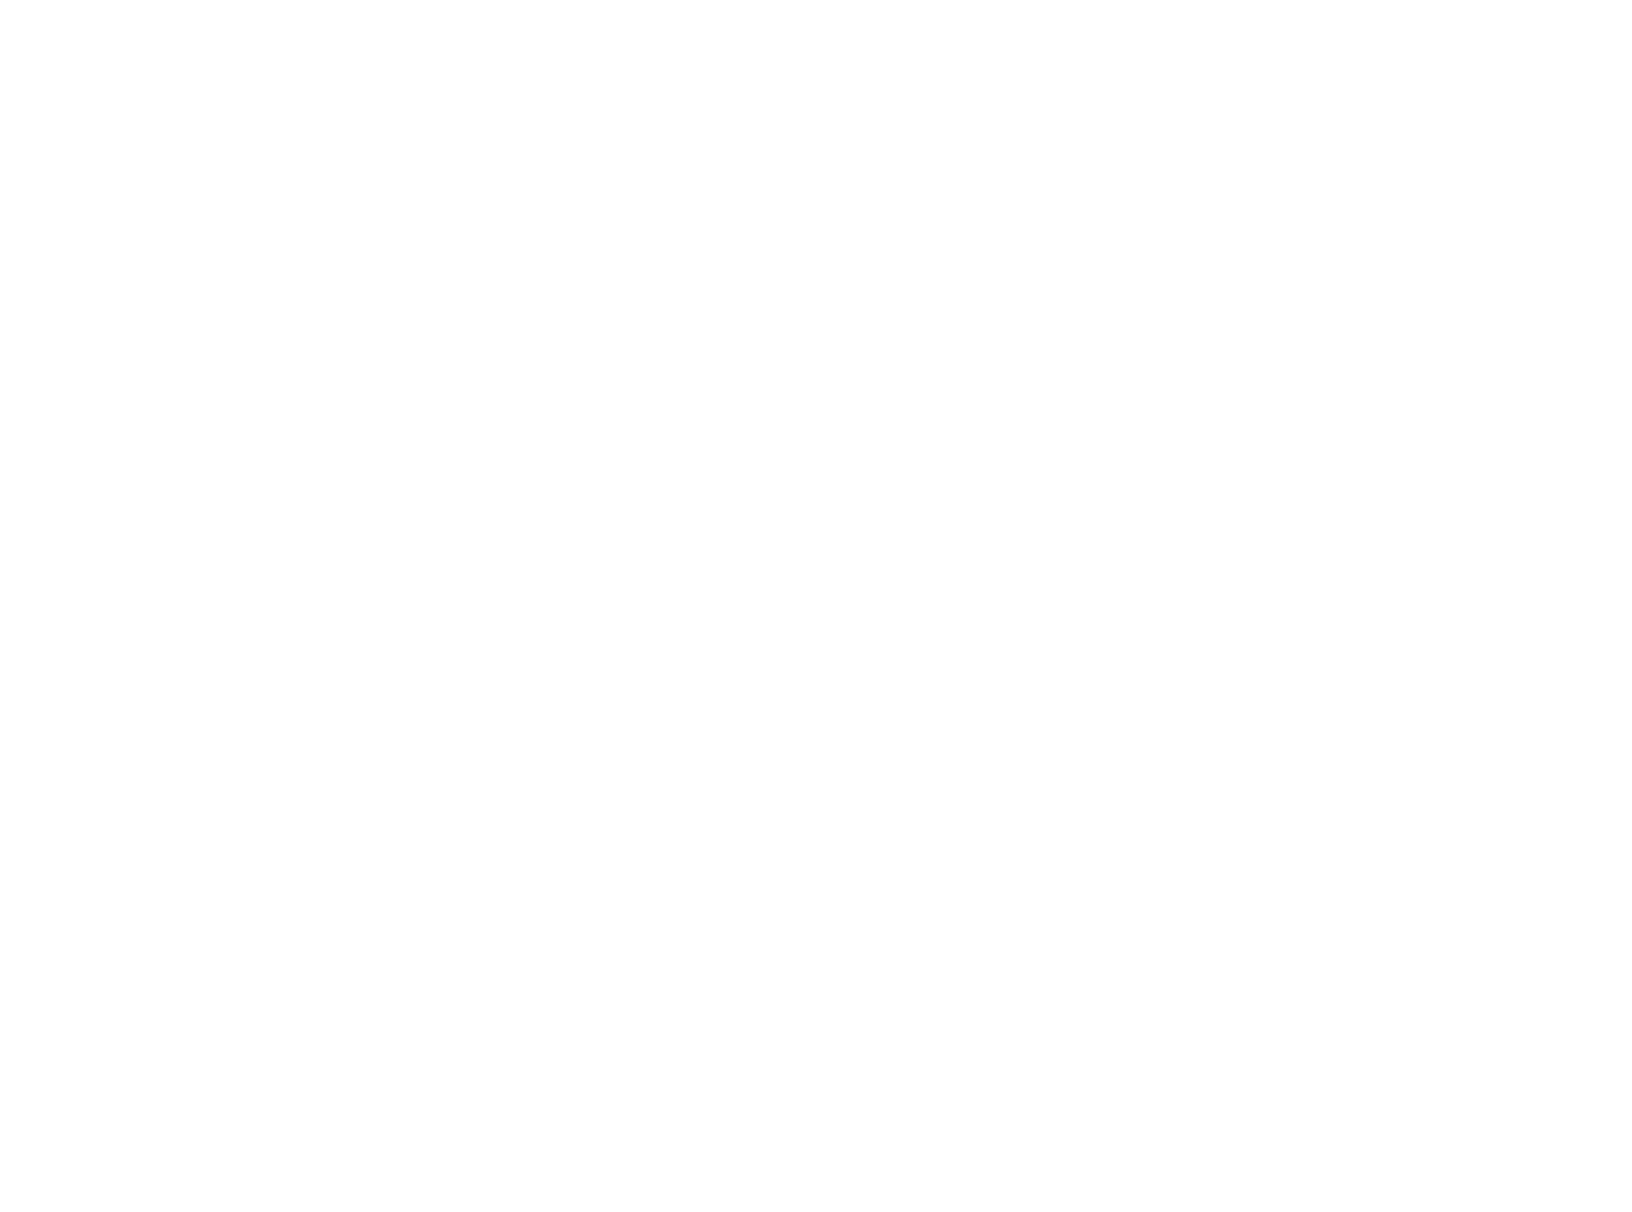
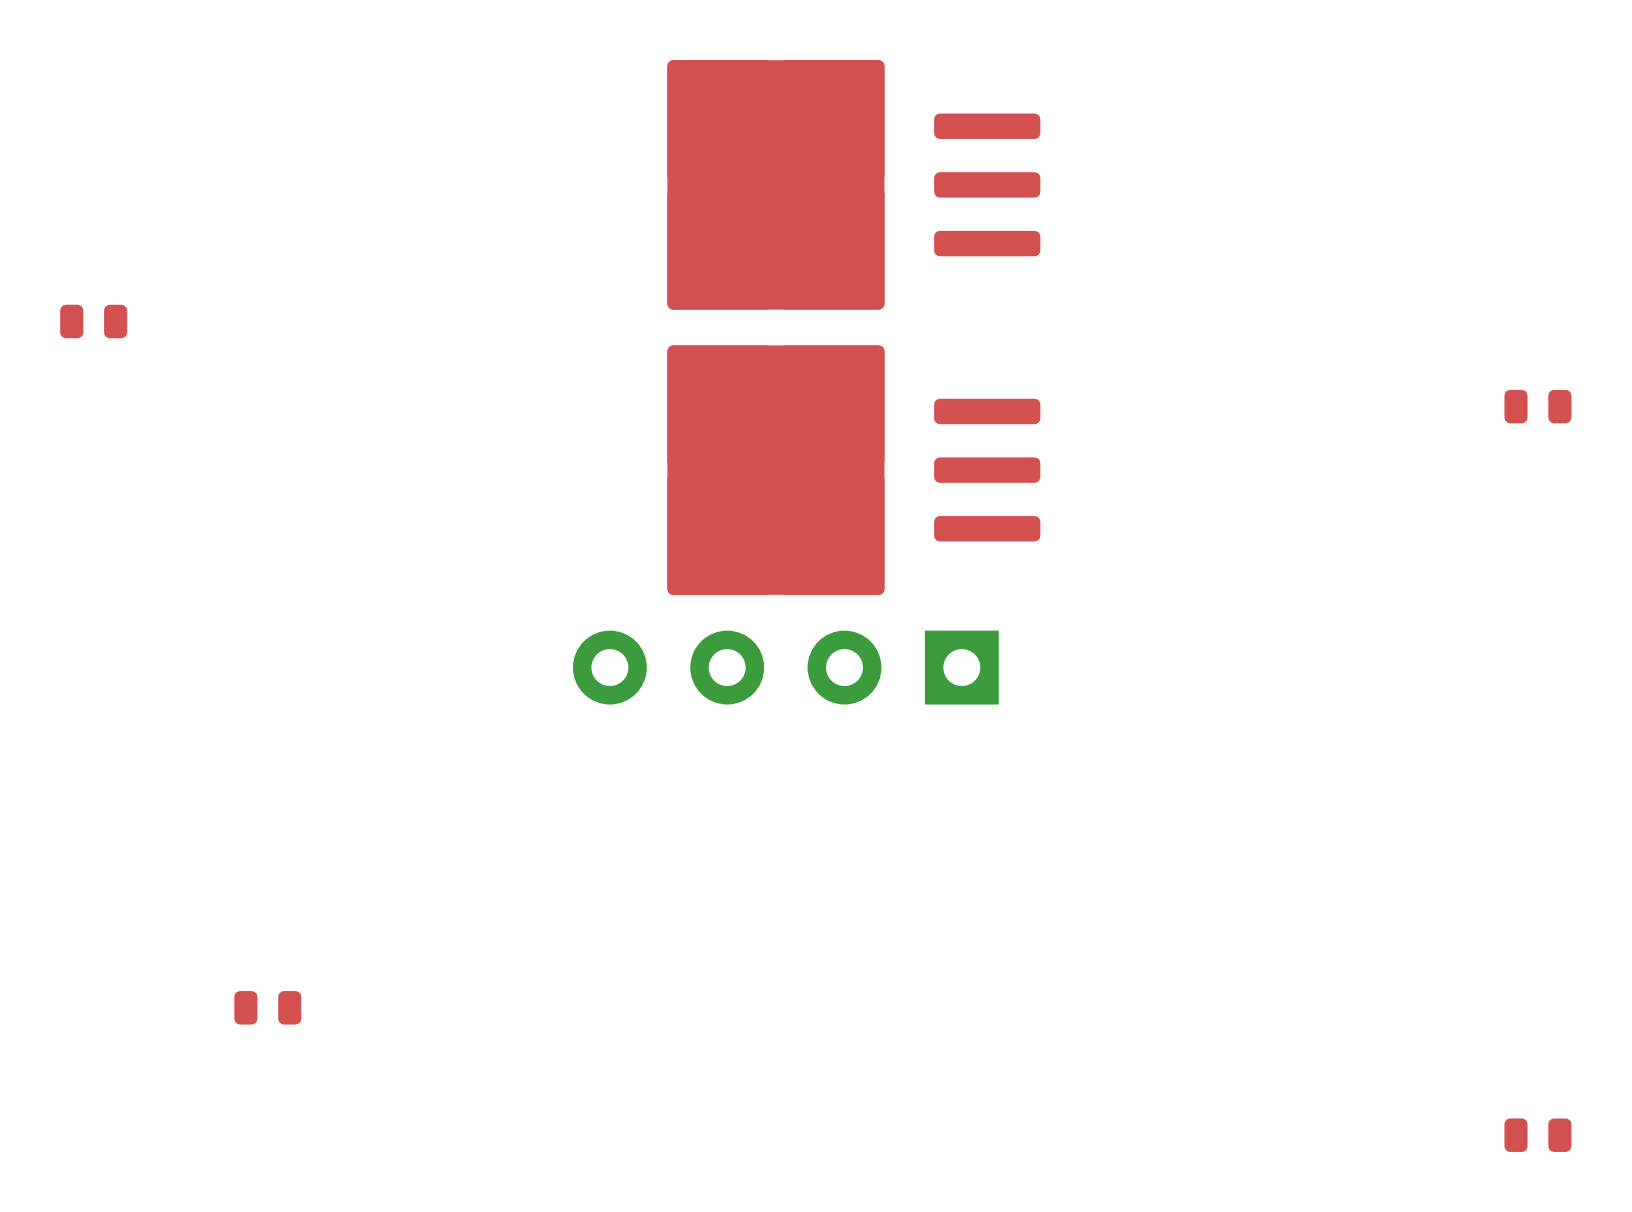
part: none -> (853, 184)
part: none -> (93, 321)
part: none -> (1537, 406)
part: none -> (853, 470)
part: none -> (785, 667)
part: none -> (267, 1007)
part: none -> (1537, 1135)

